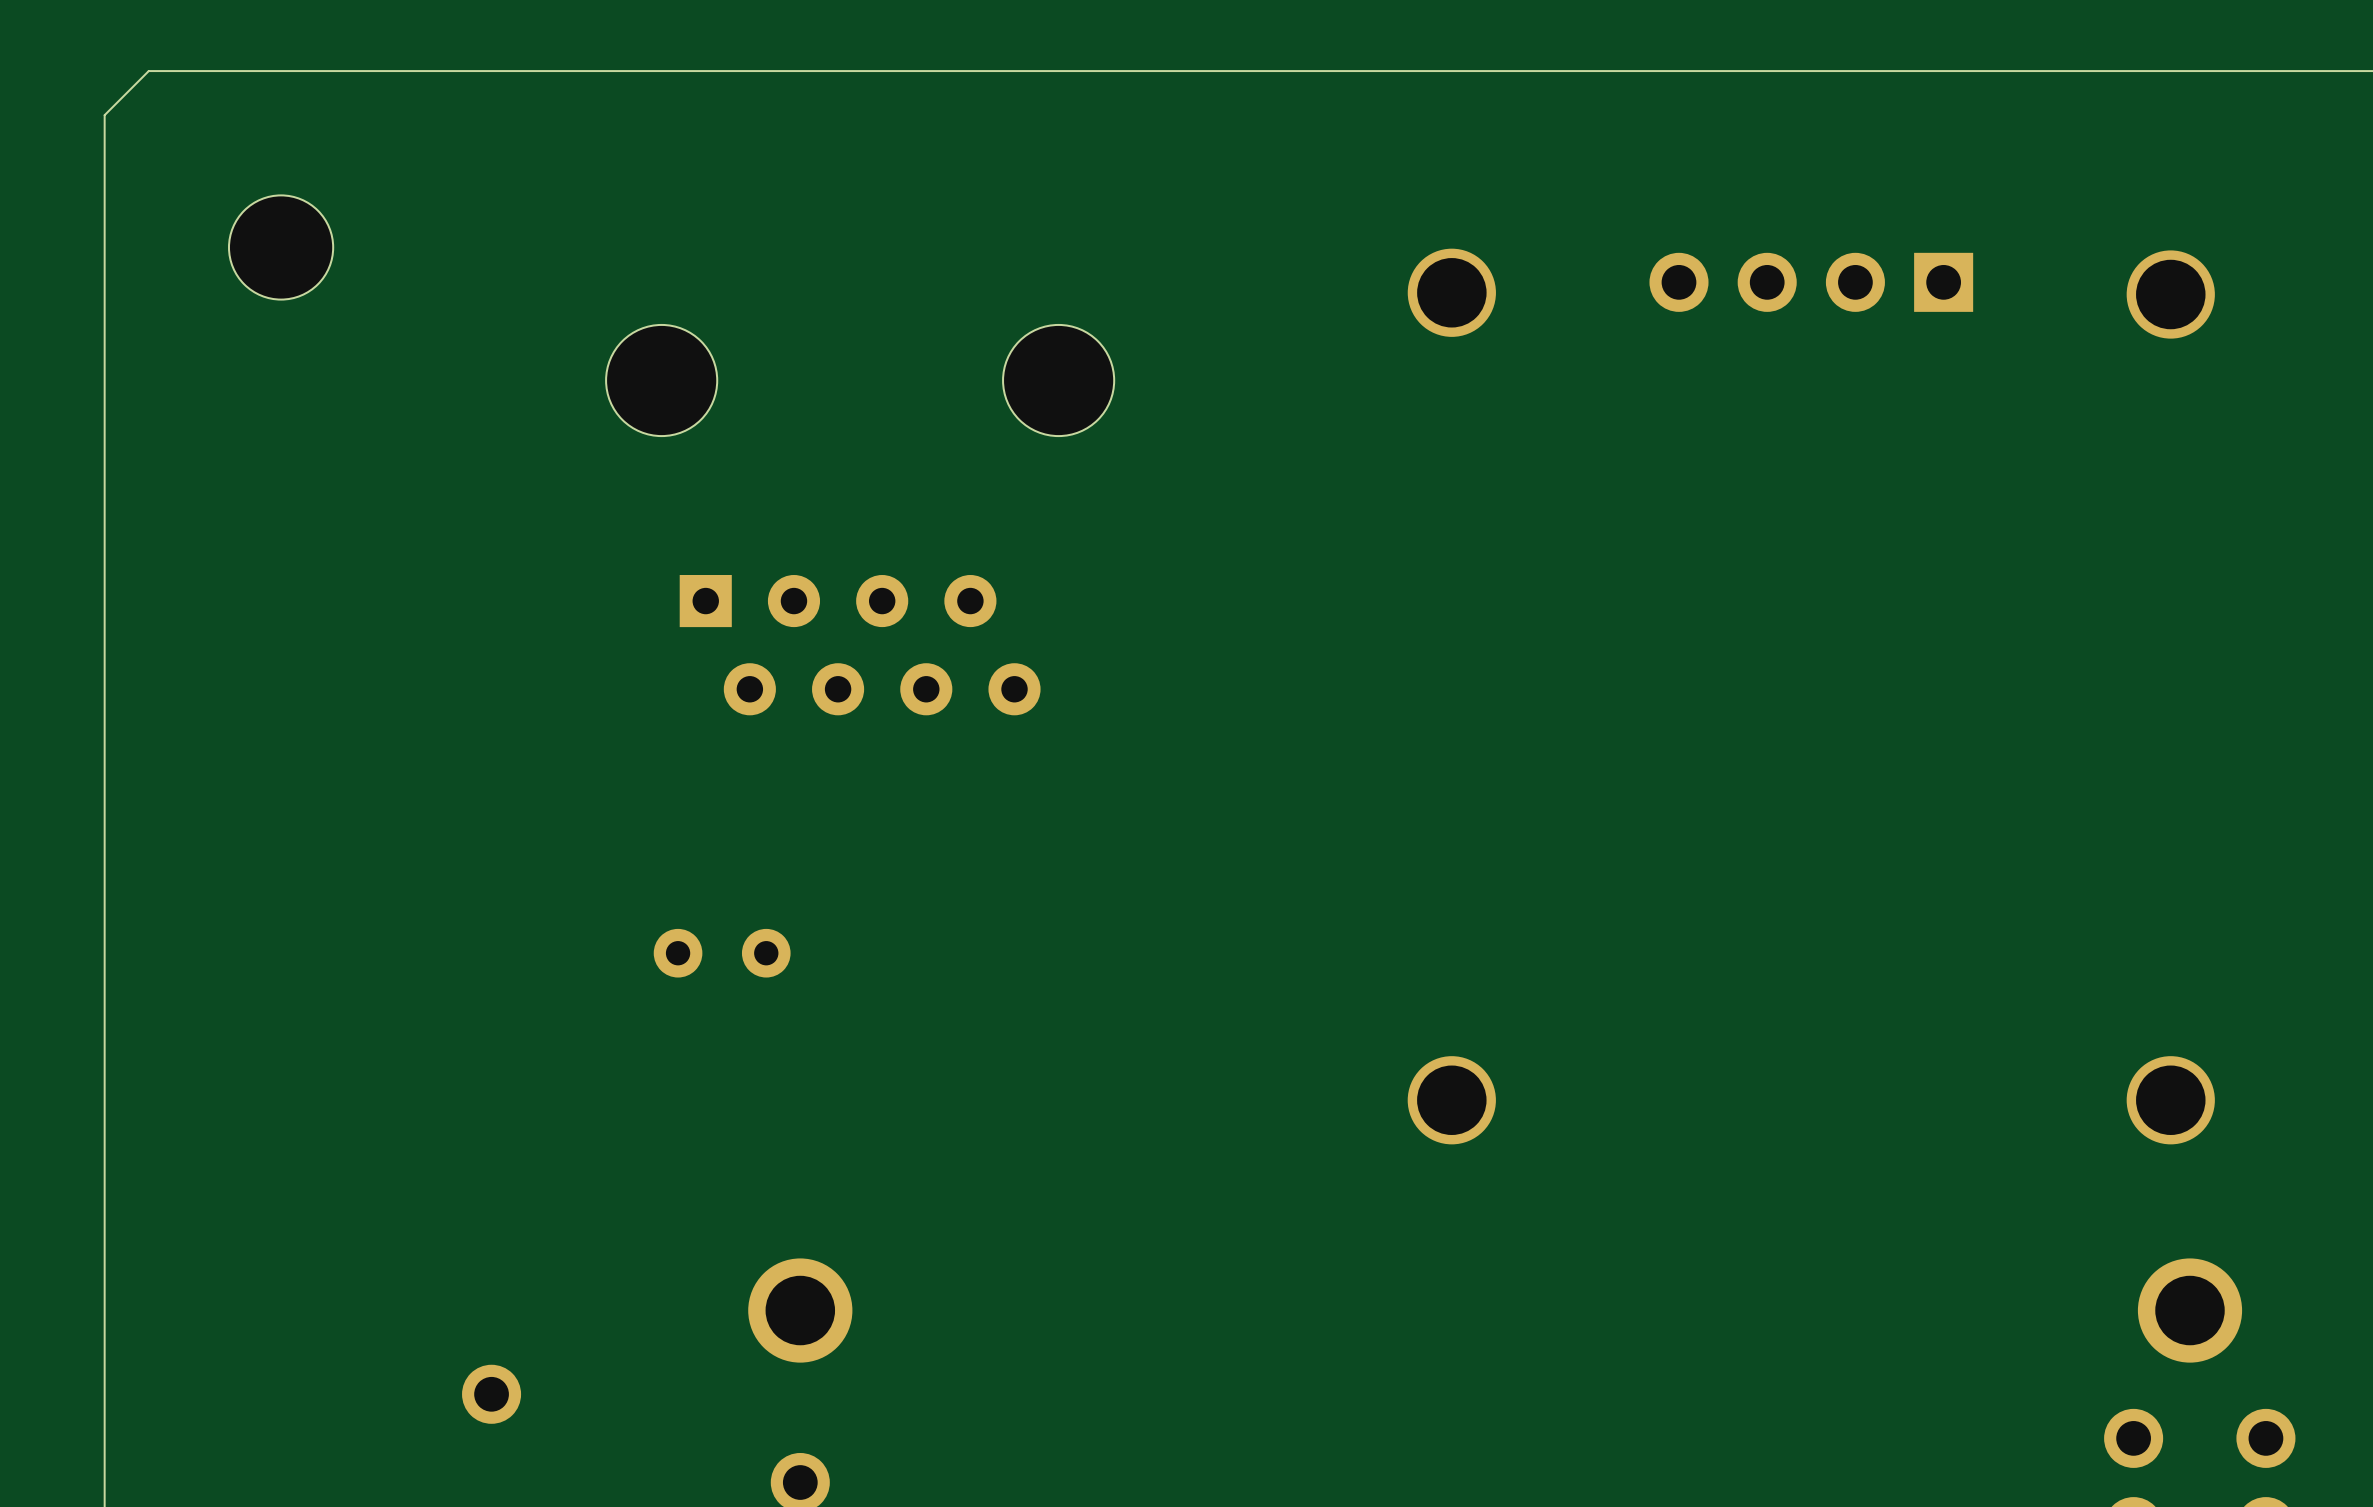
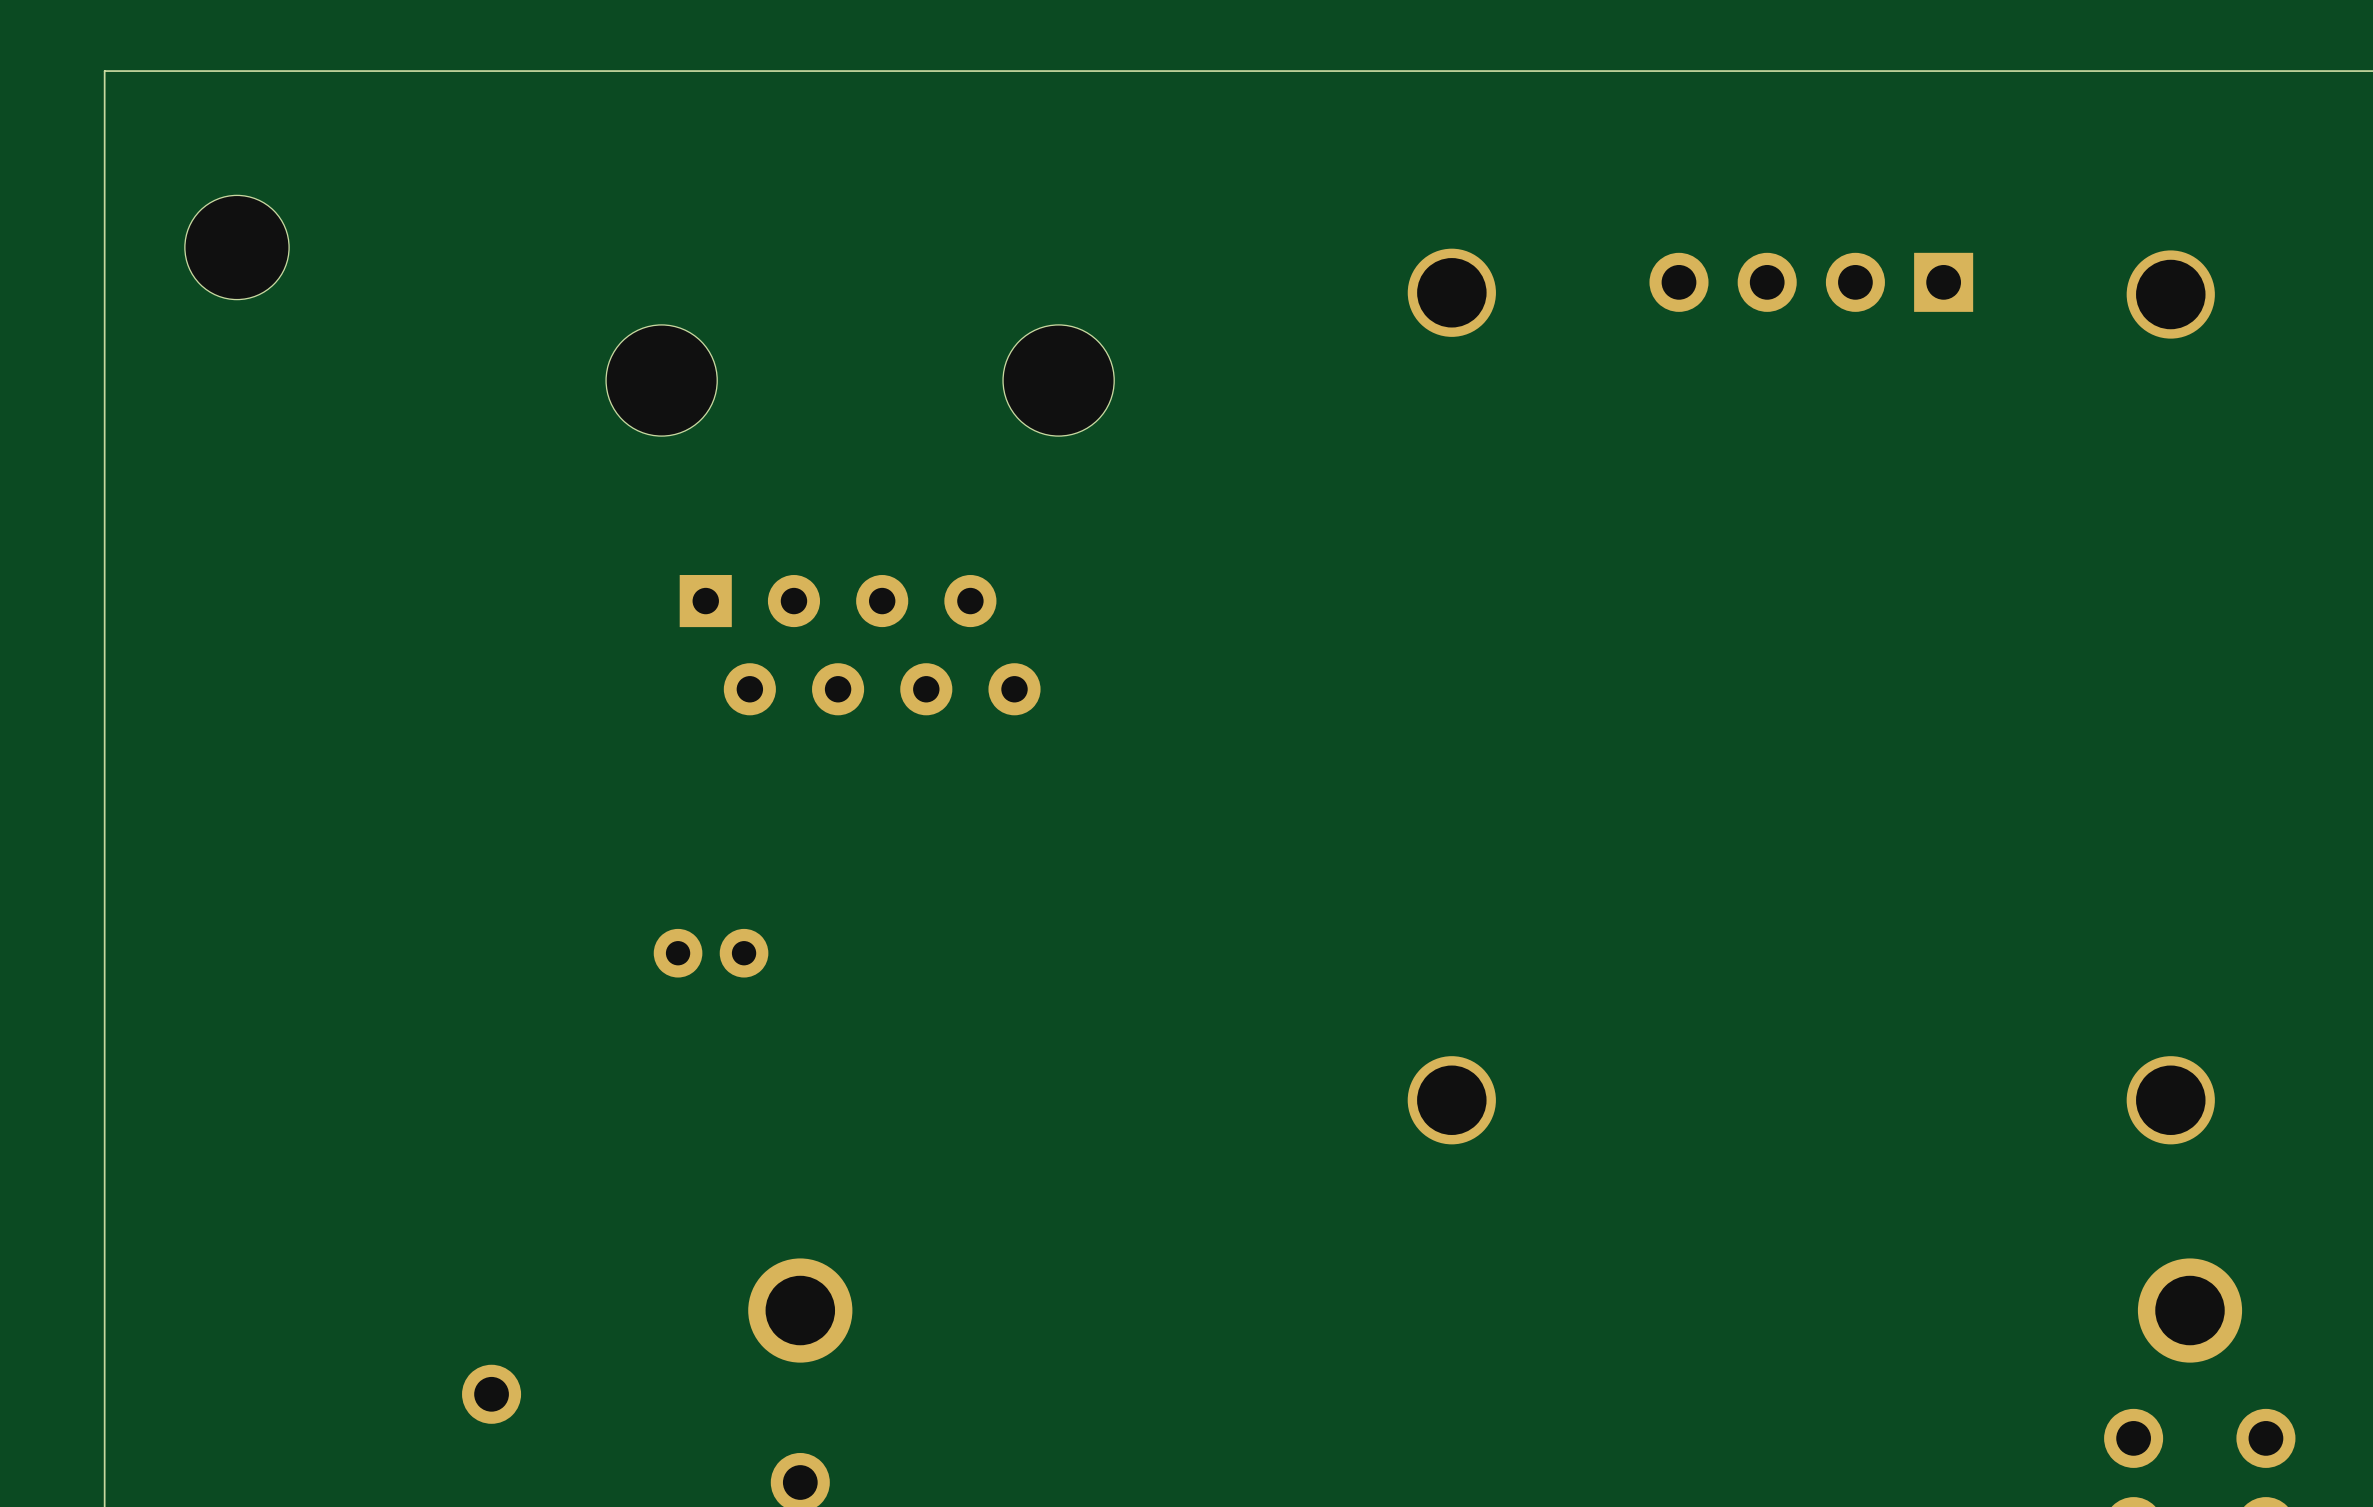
board edge: (148, 71) (104, 115) -> (148, 71) (104, 71) (104, 115)
part position: (281, 247) -> (236, 247)
part footprint: [653, 928, 791, 978] -> [653, 928, 769, 978]

